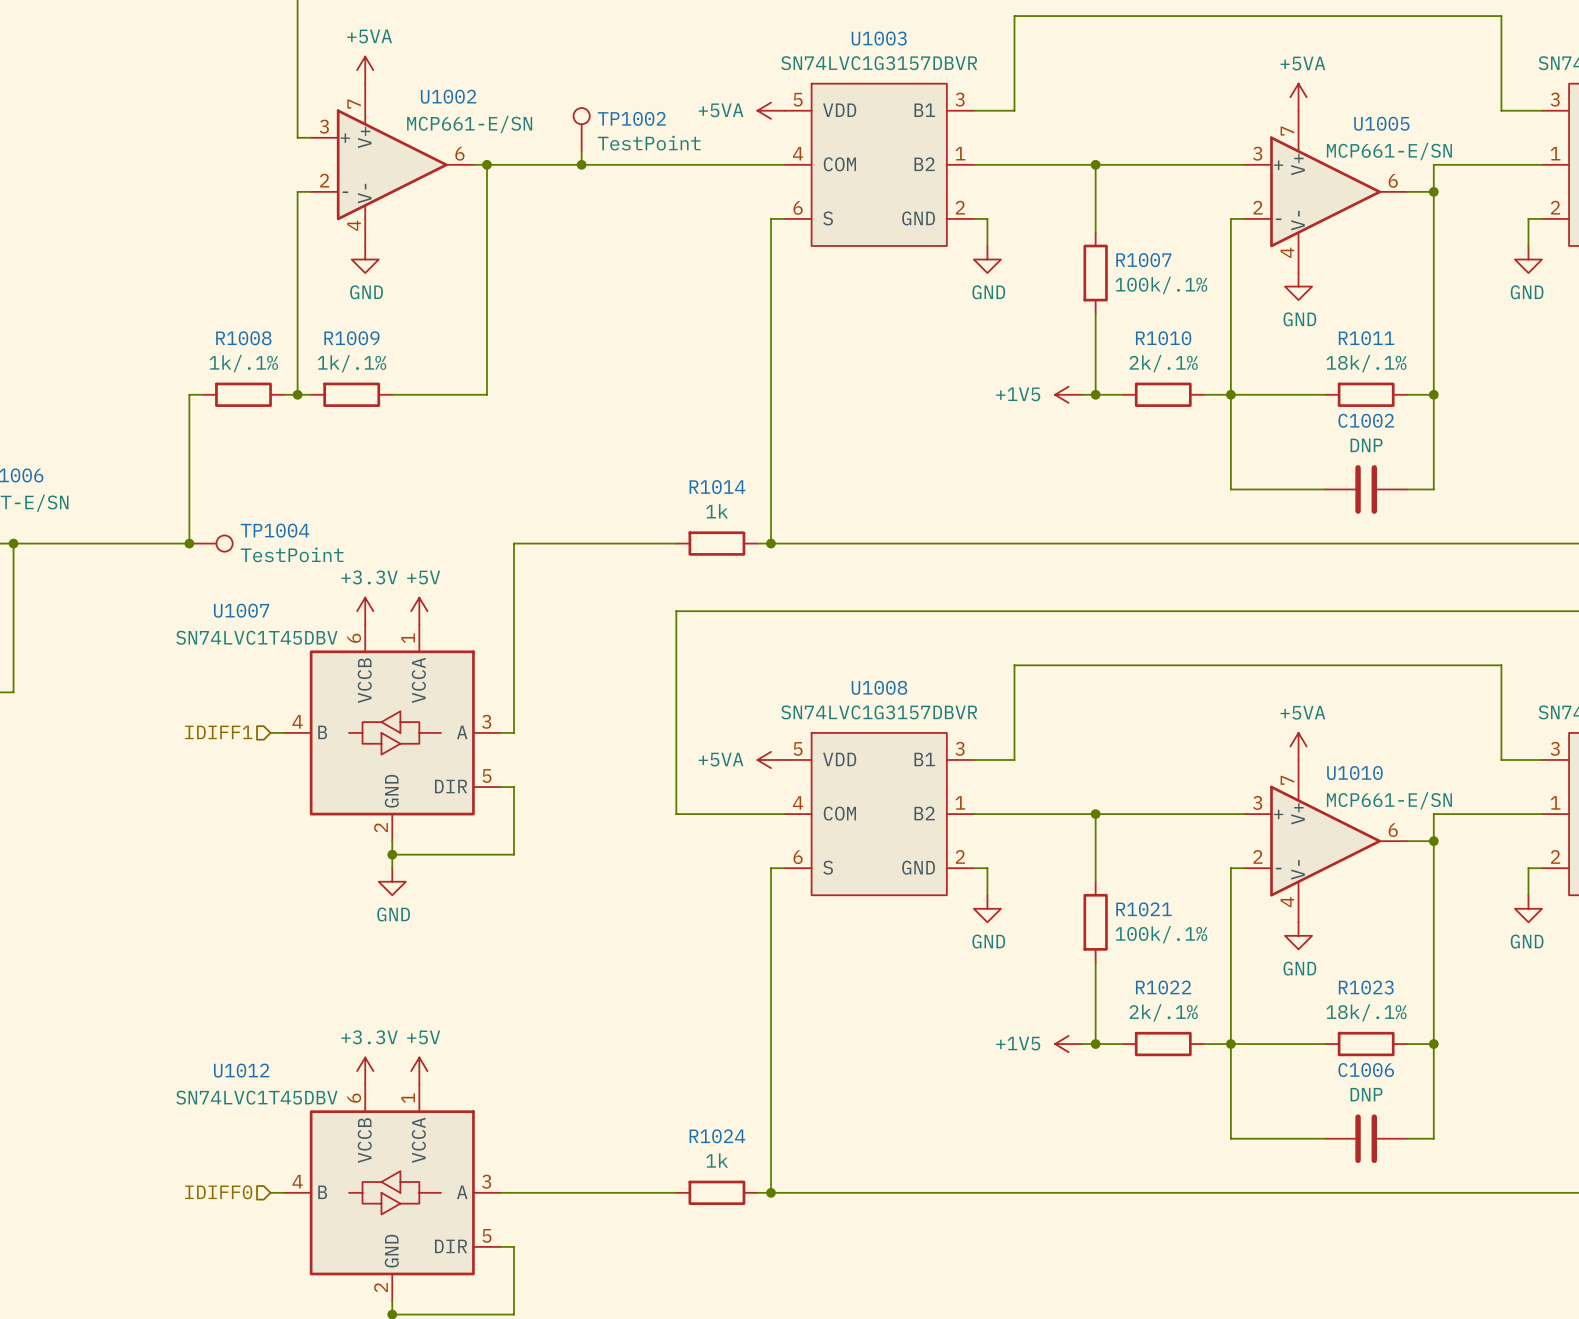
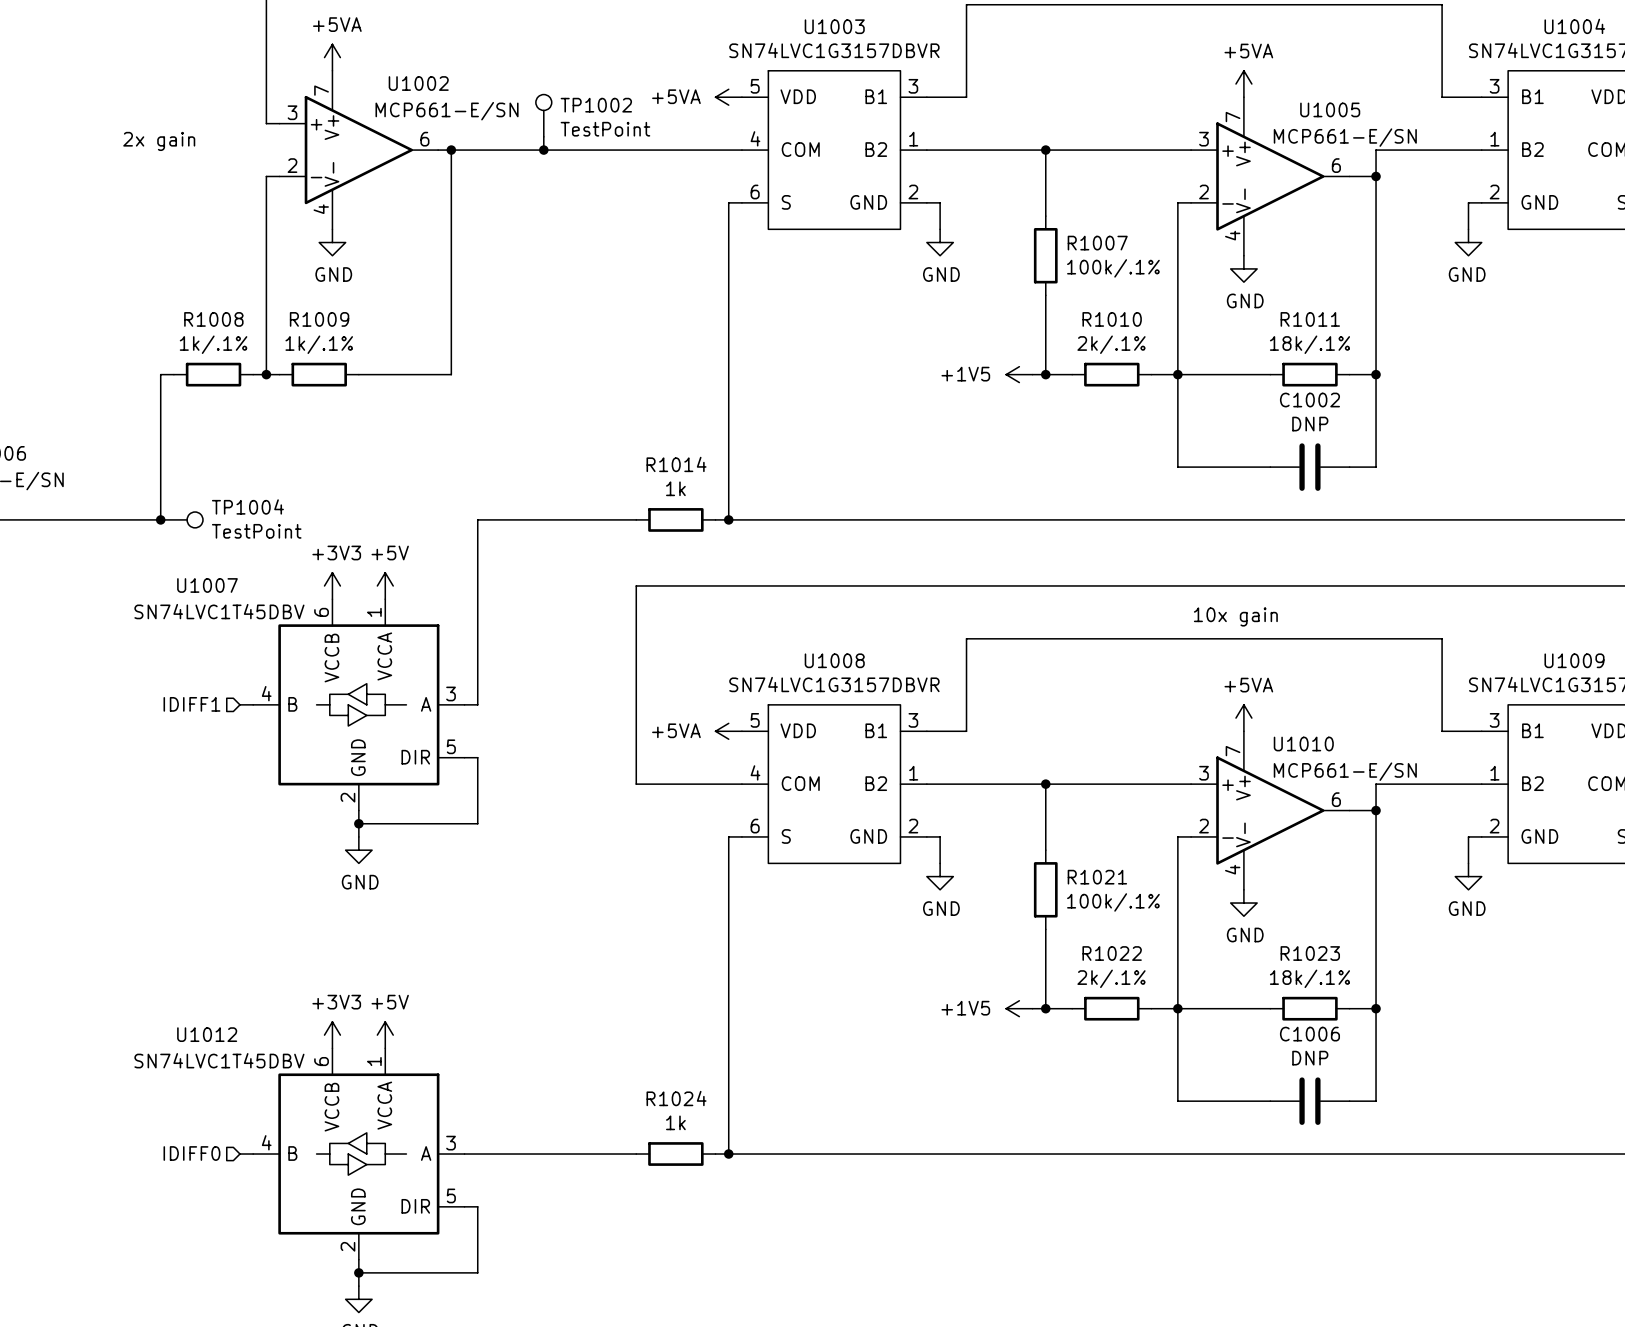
text: none -> 2x gain (159, 141)
power symbol: +3.3V (365, 611) -> +3V3 (332, 585)
text: none -> 10x gain (1235, 616)
power symbol: +3.3V (365, 1071) -> +3V3 (332, 1035)

